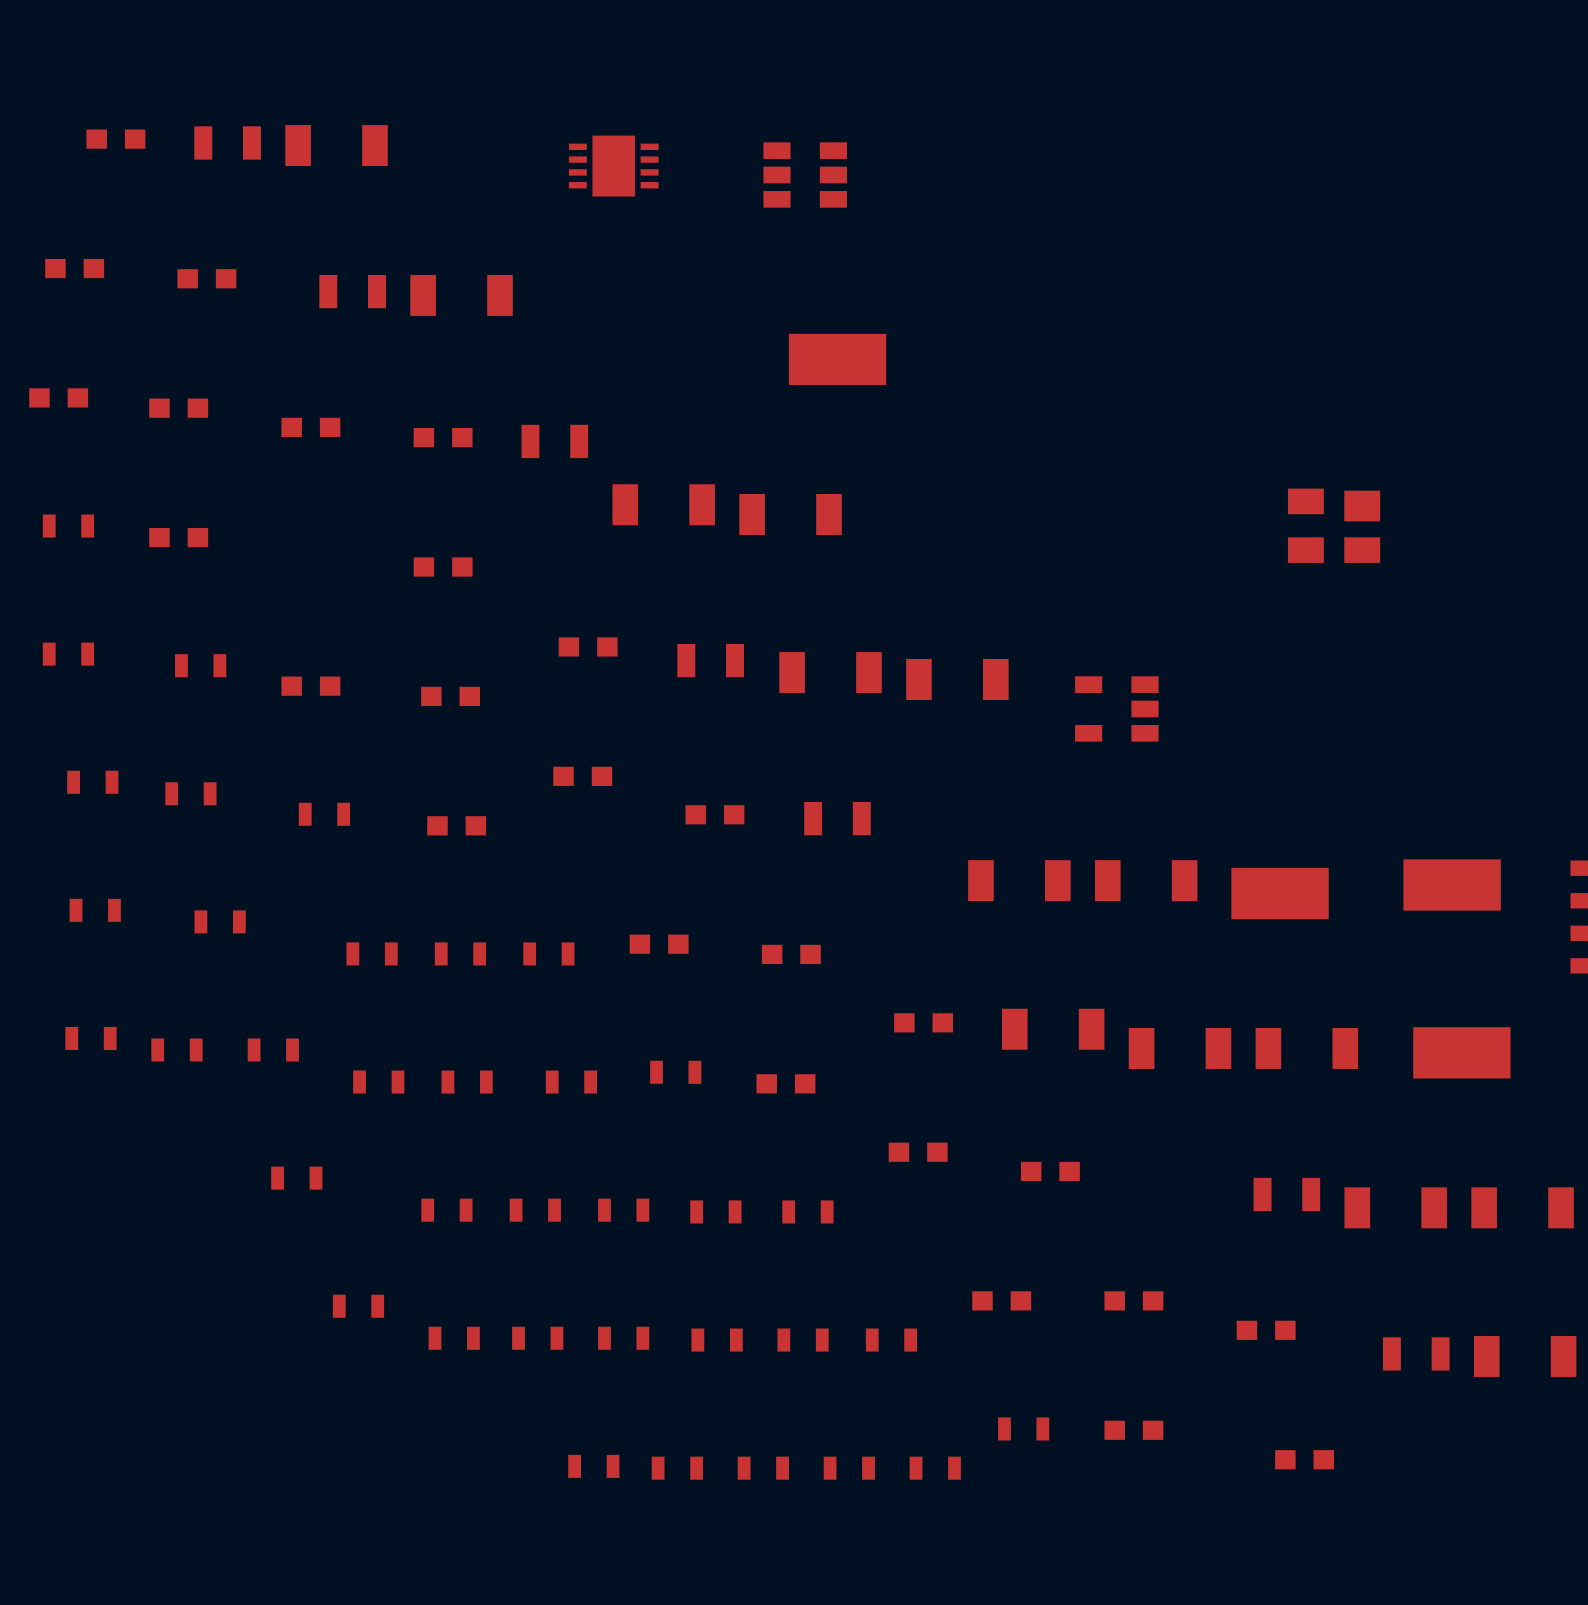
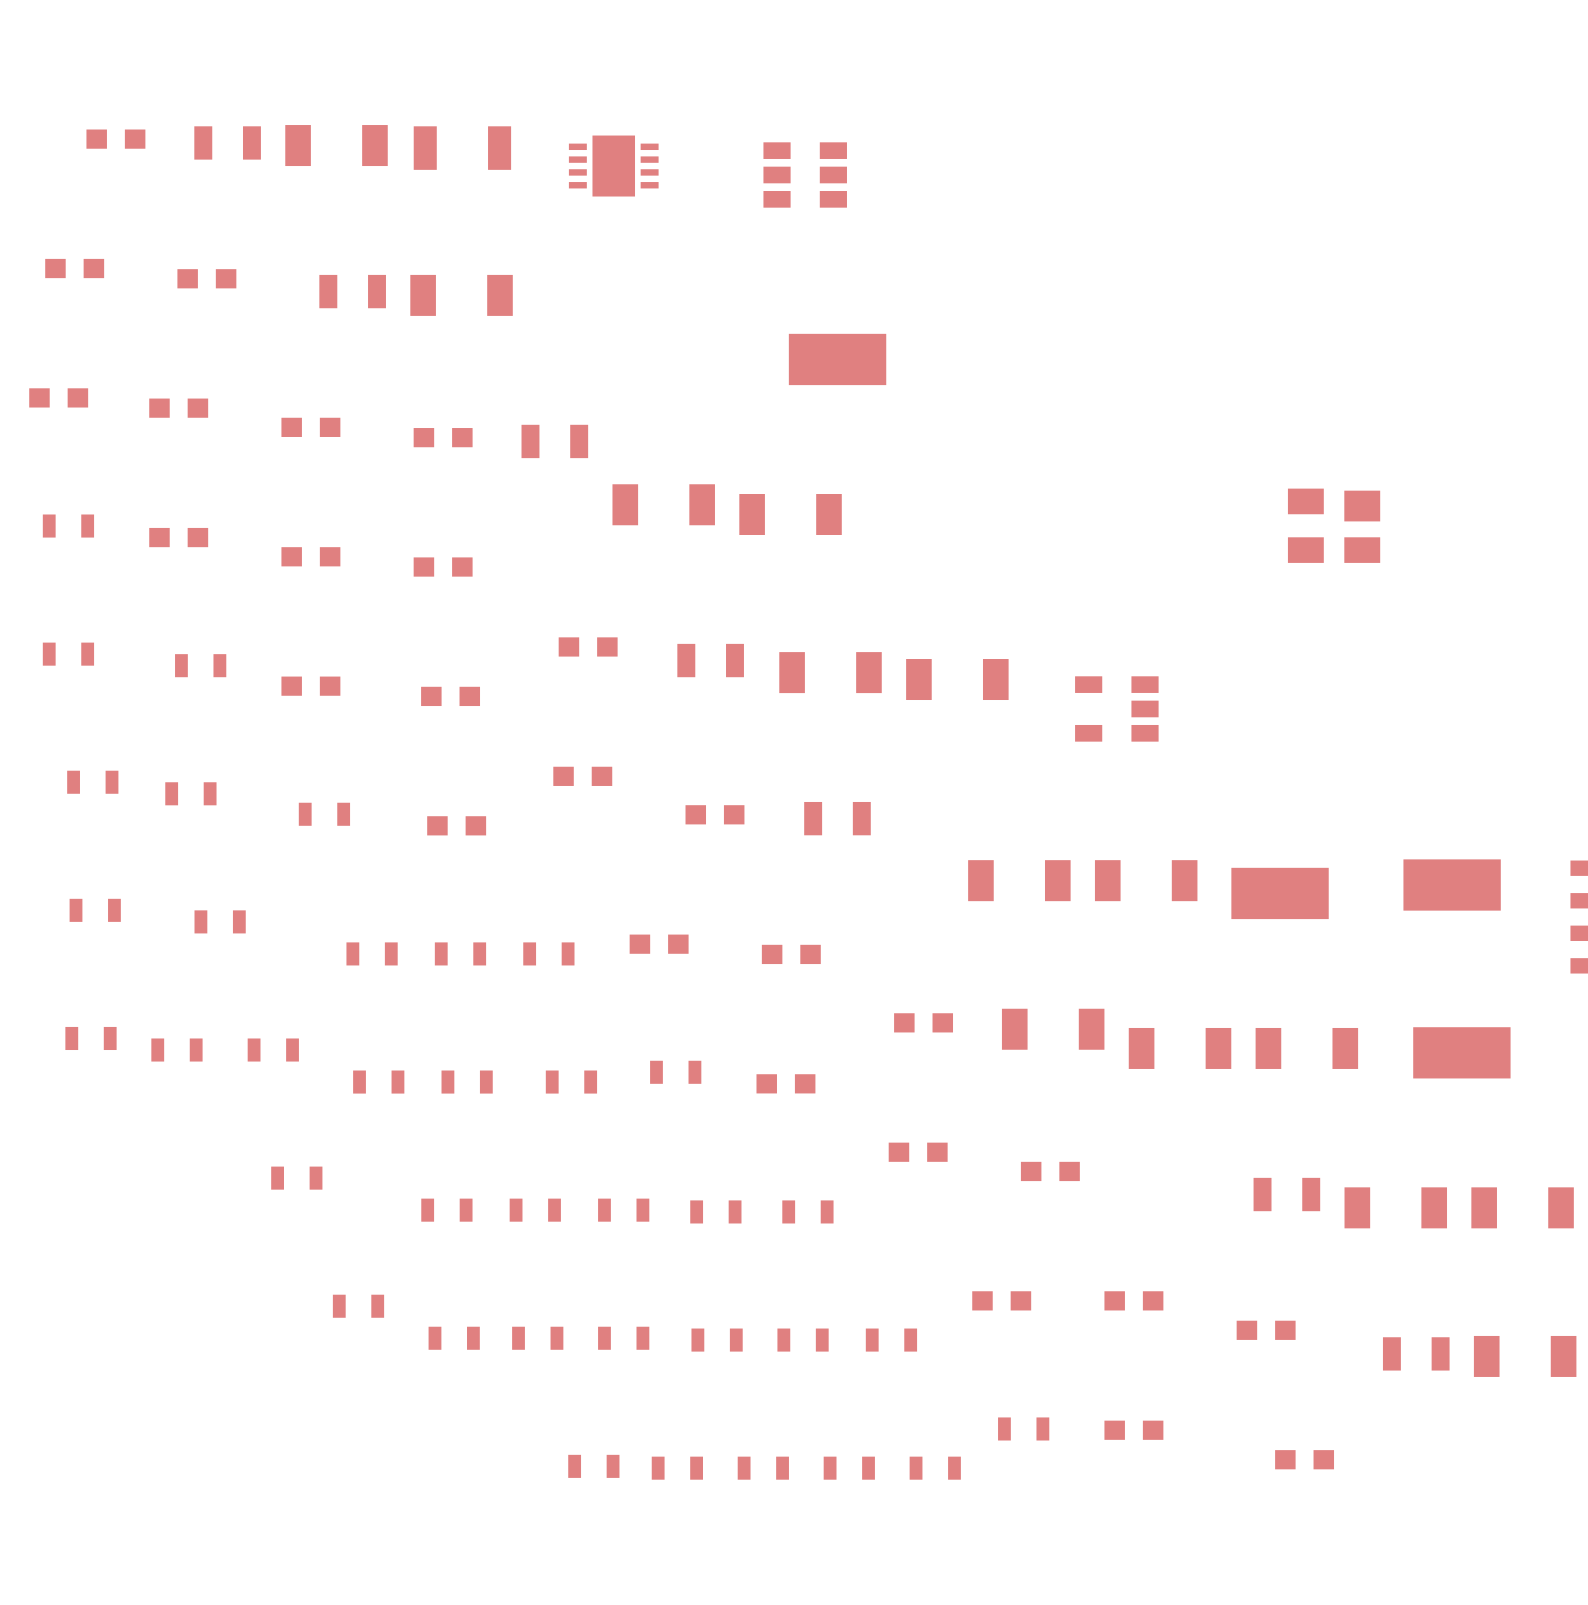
part: none -> (462, 148)
part: none -> (310, 556)

